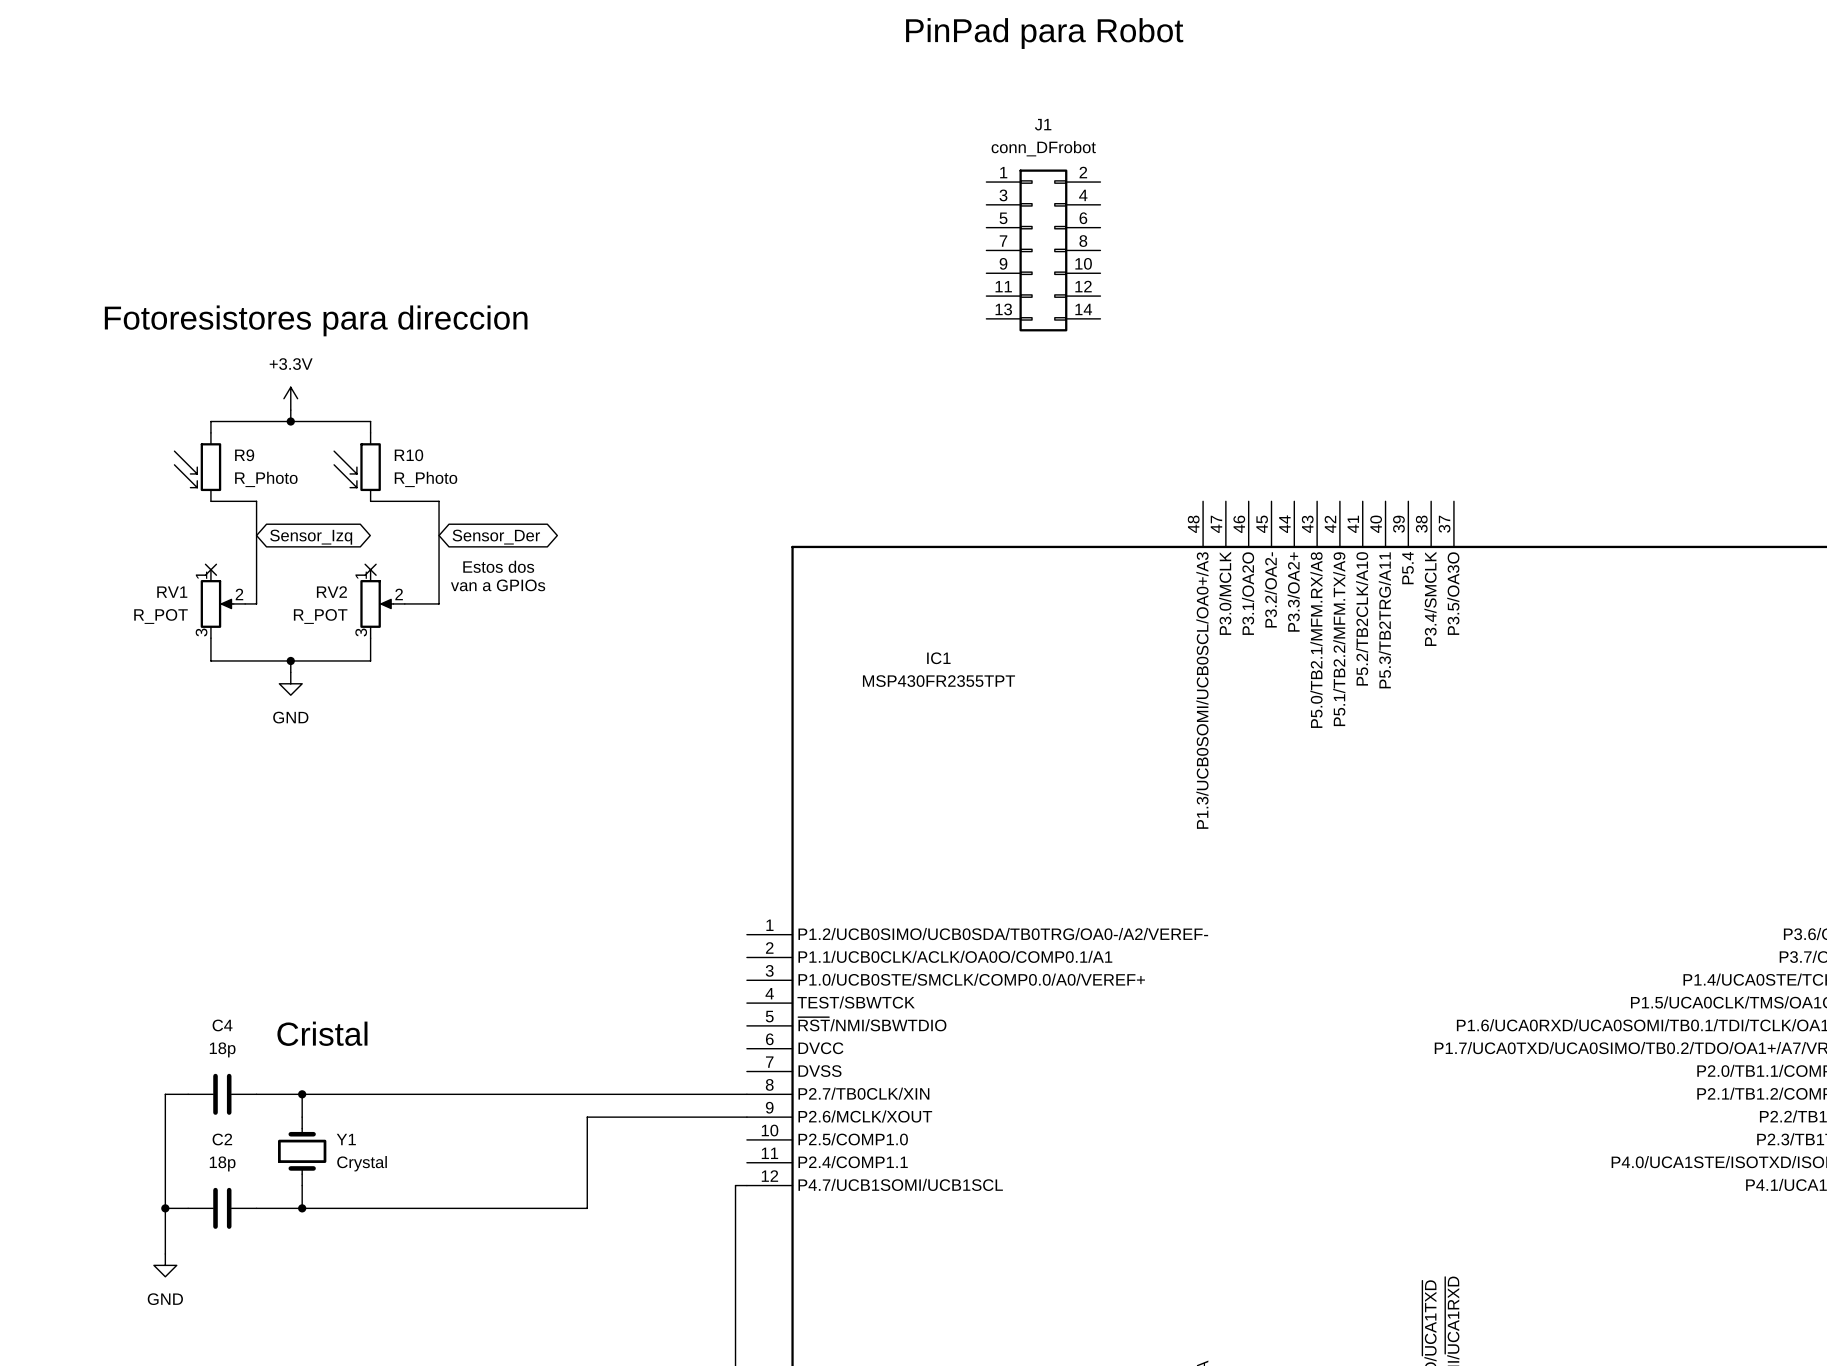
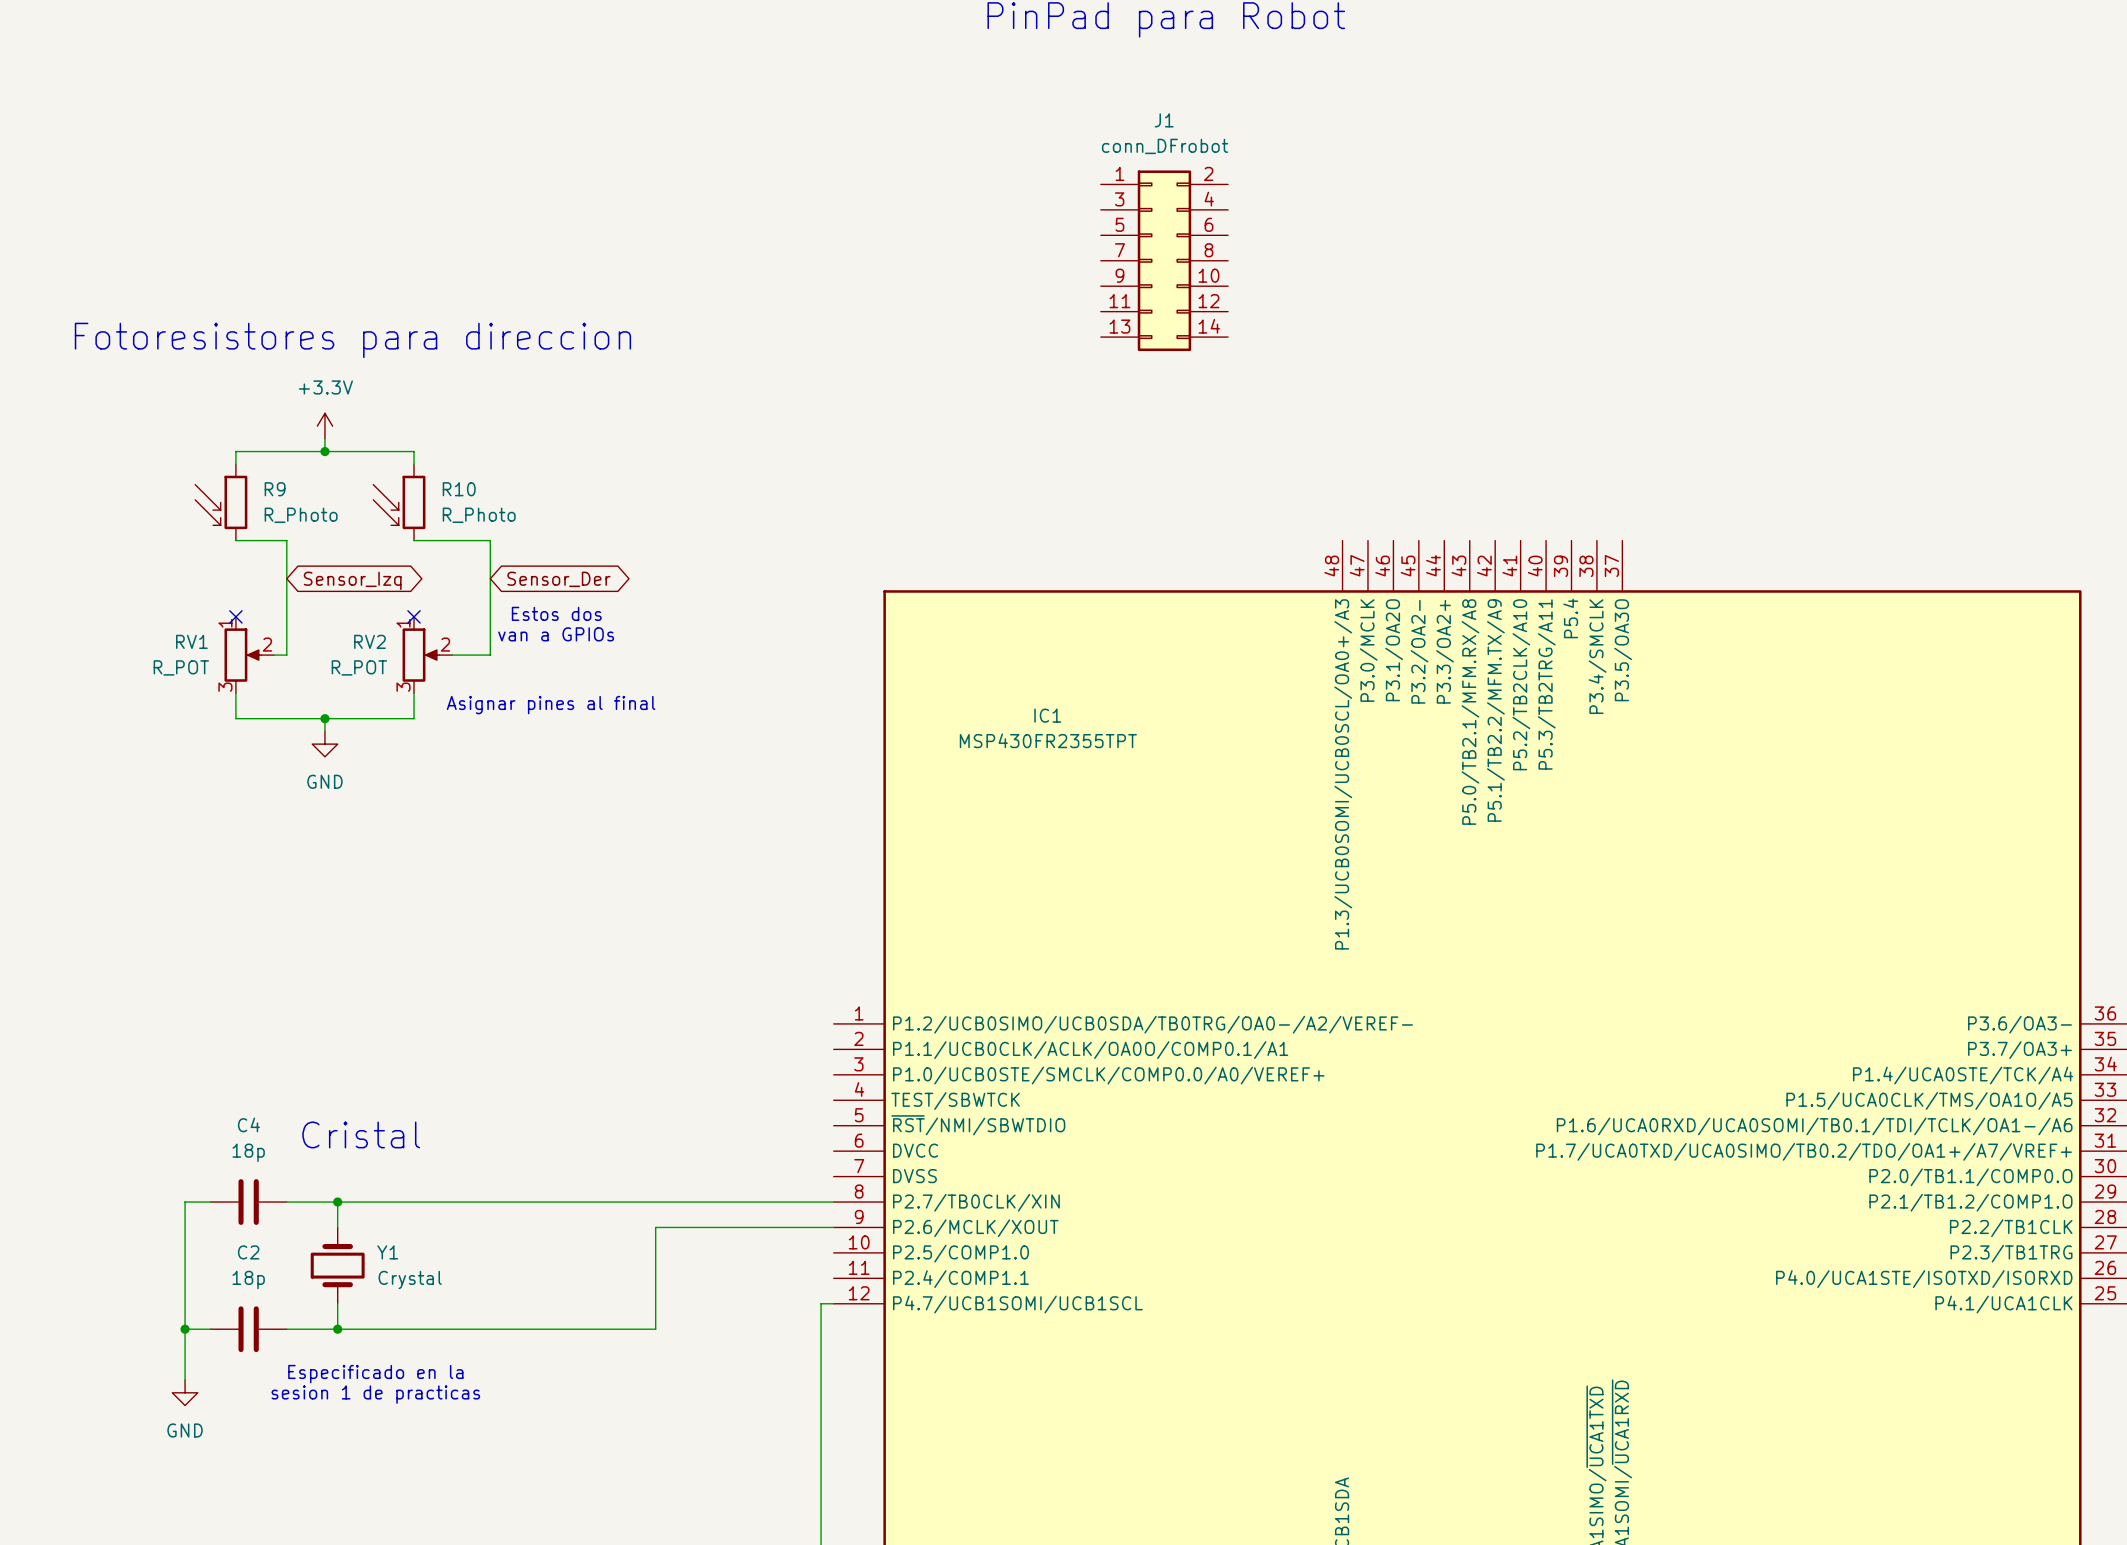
text: none -> Asignar pines al final (551, 705)
text: none -> Especificado en la (375, 1374)
text: none -> sesion 1 de practicas (375, 1394)

